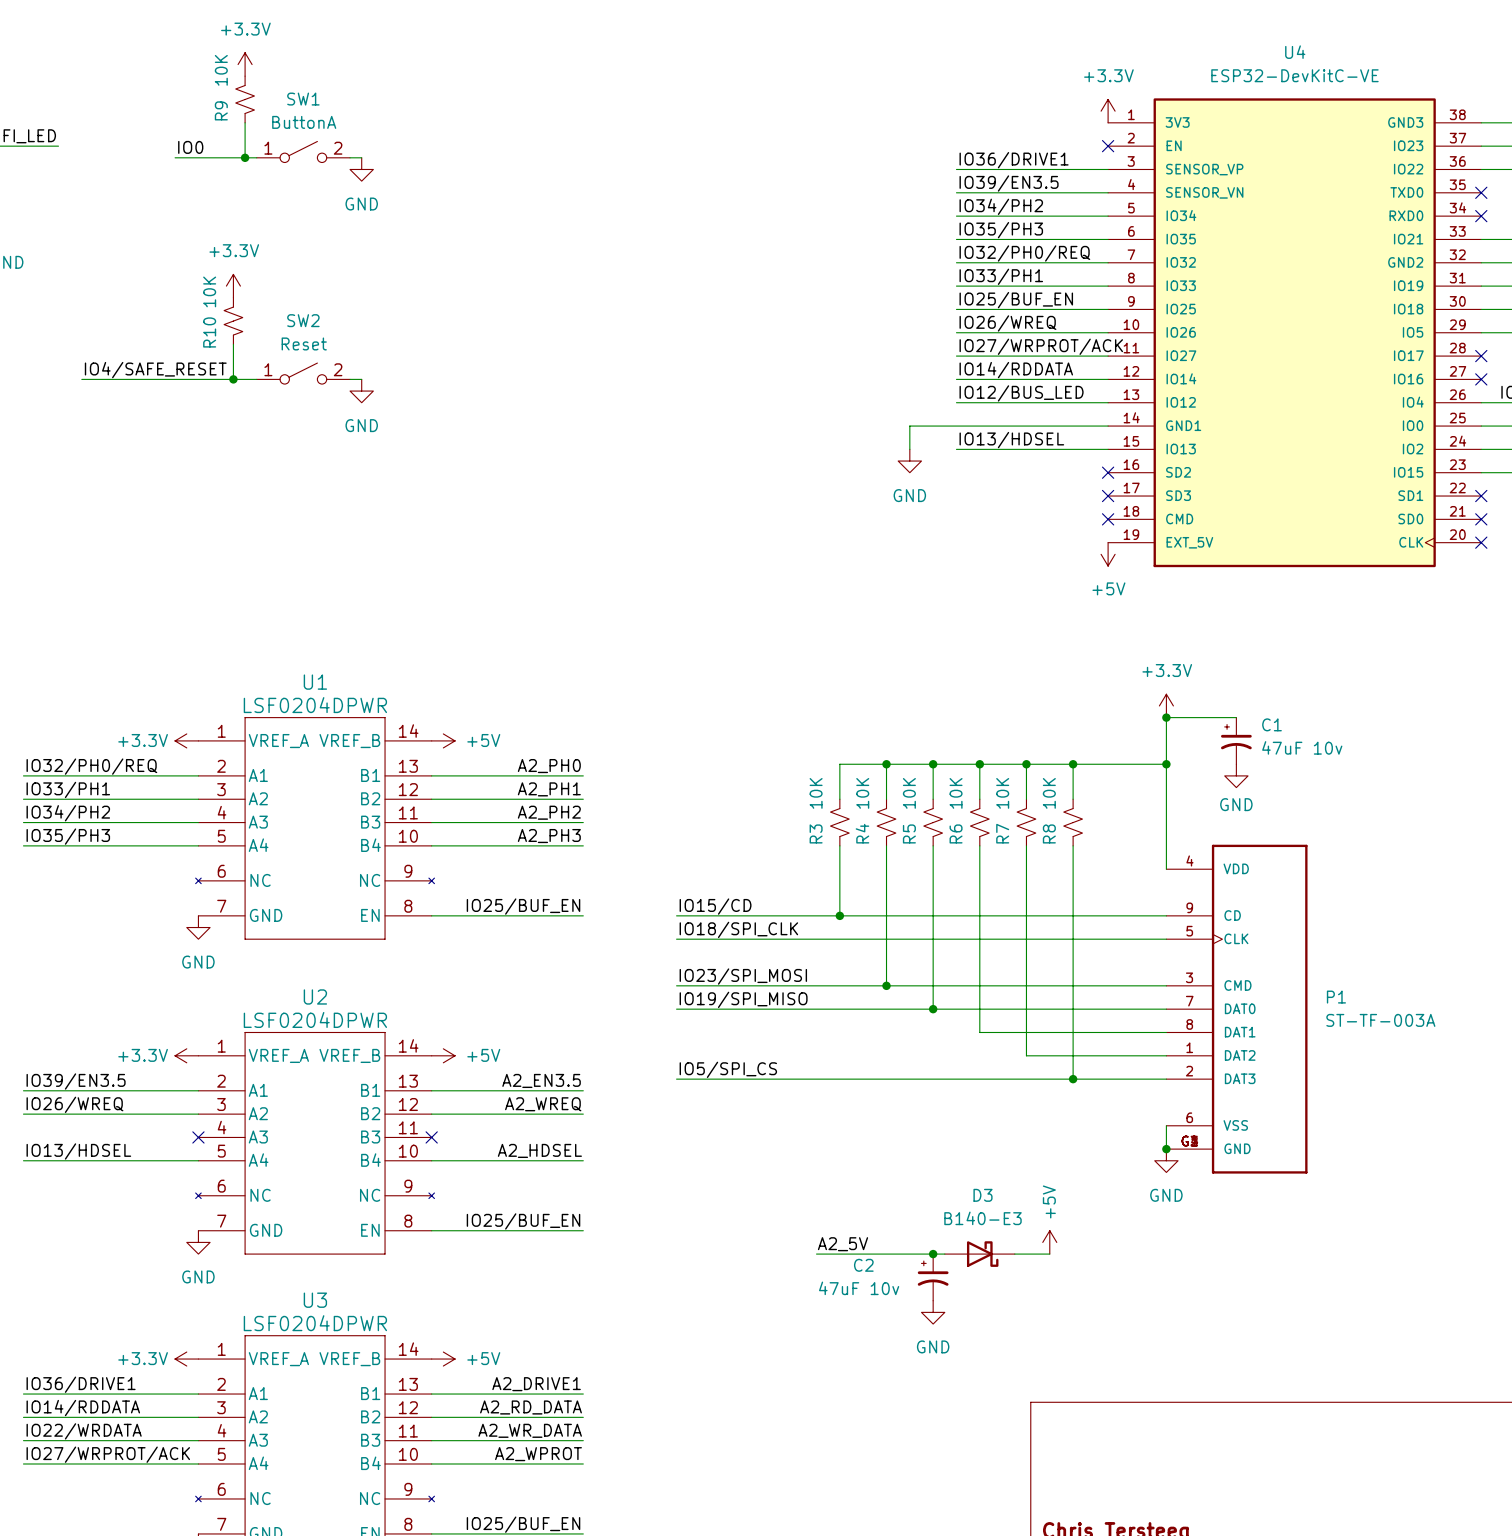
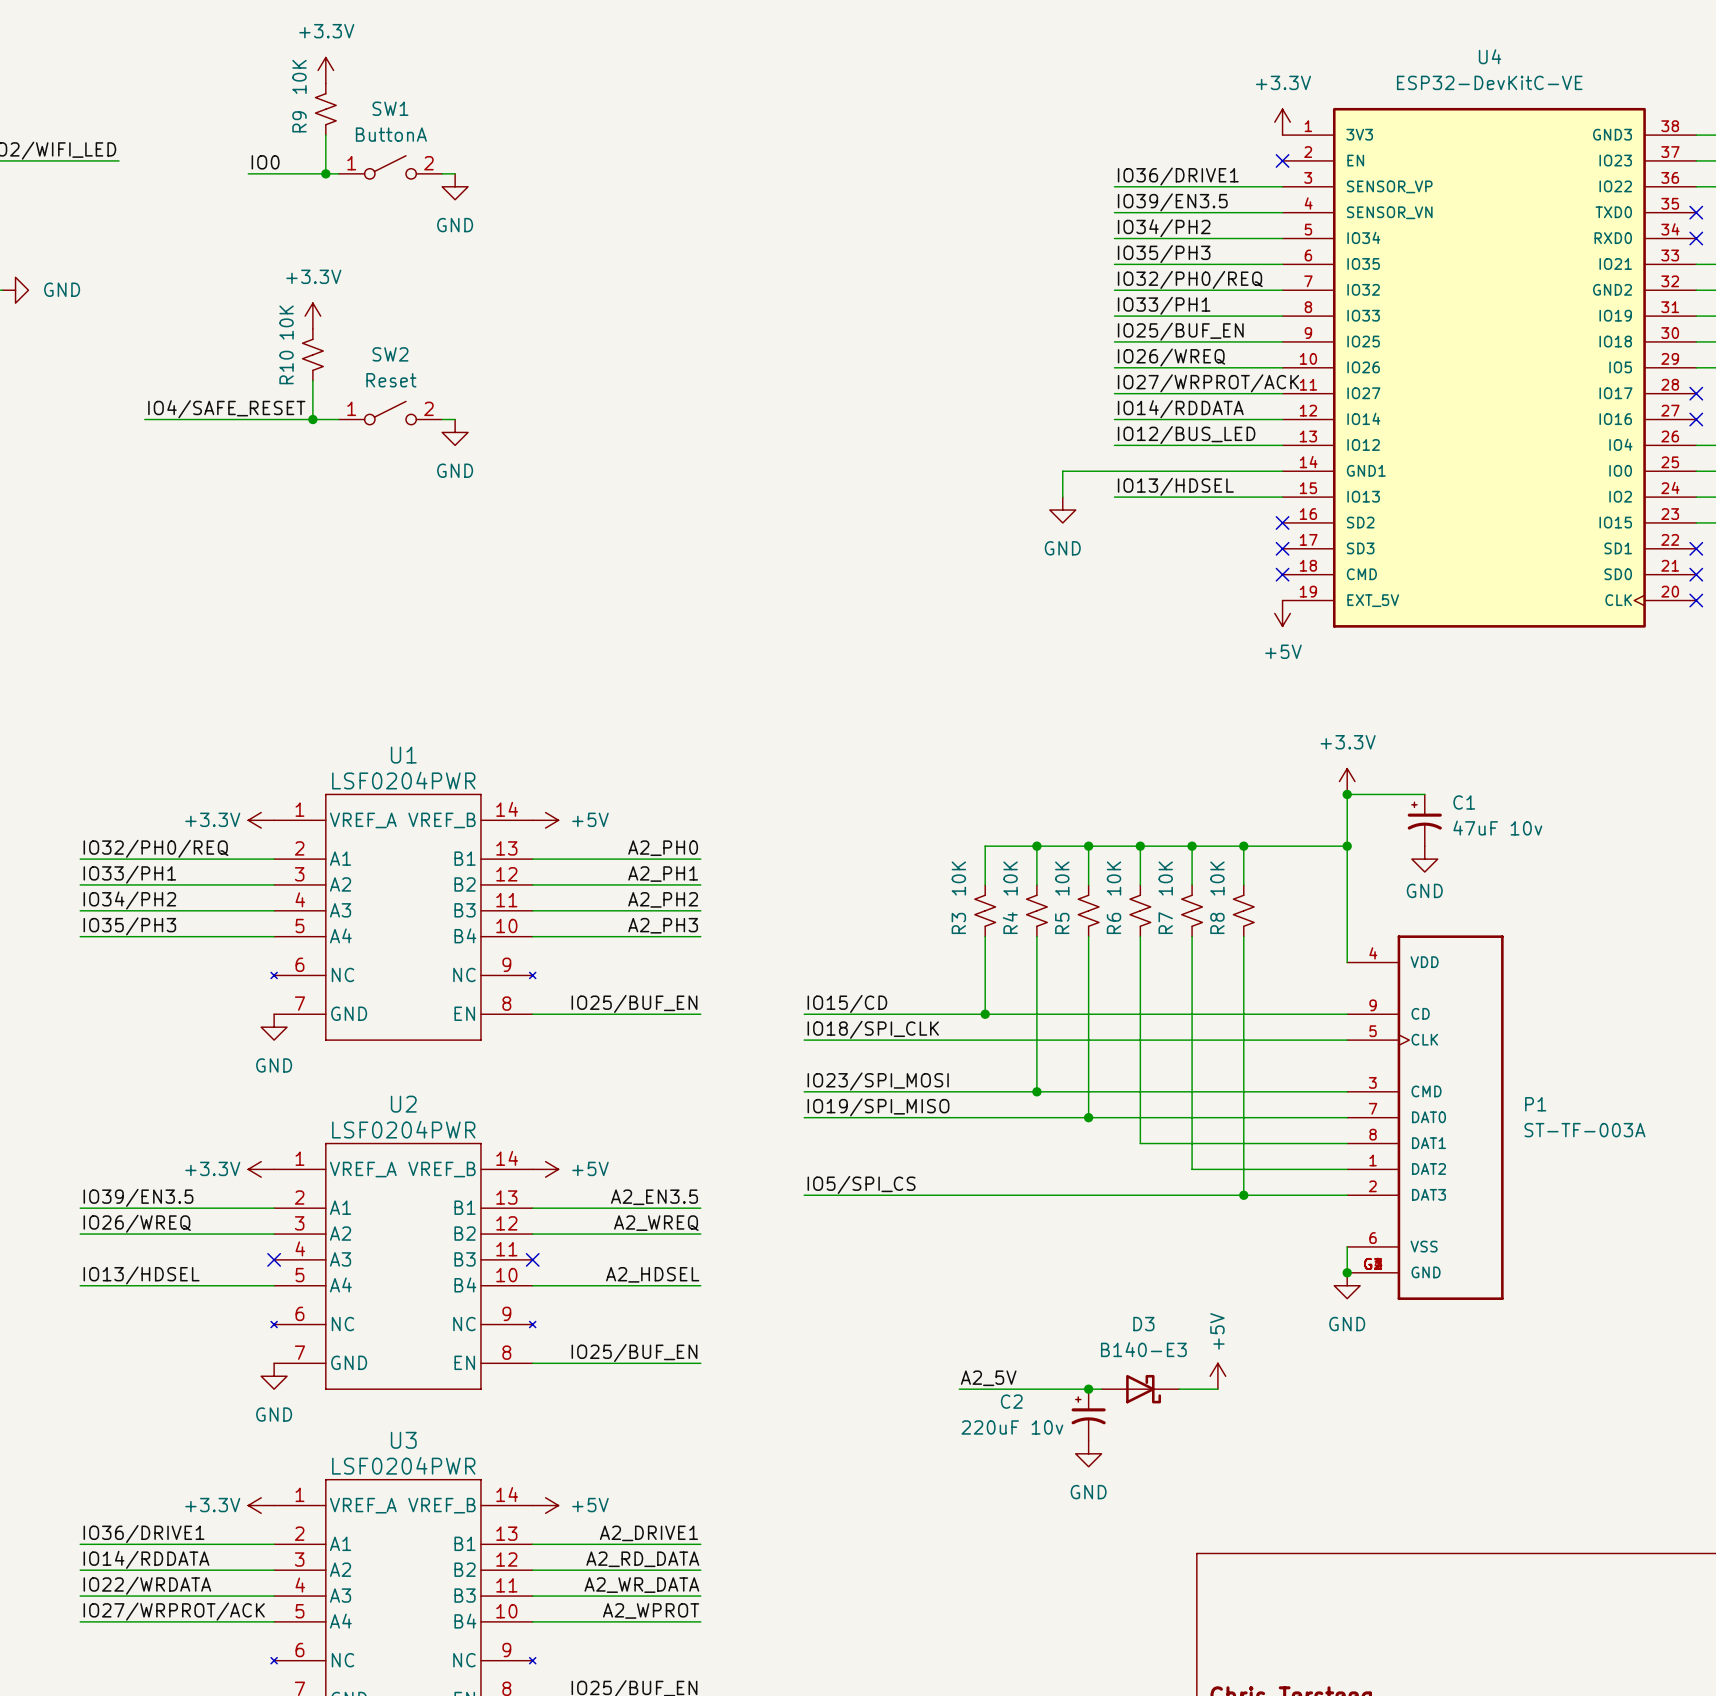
U1 value: LSF0204DPWR (315, 705) -> LSF0204PWR (403, 780)
U2 value: LSF0204DPWR (315, 1019) -> LSF0204PWR (403, 1129)
C2 value: 47uF 10v (859, 1288) -> 220uF 10v (1012, 1427)
U3 value: LSF0204DPWR (315, 1323) -> LSF0204PWR (403, 1465)

